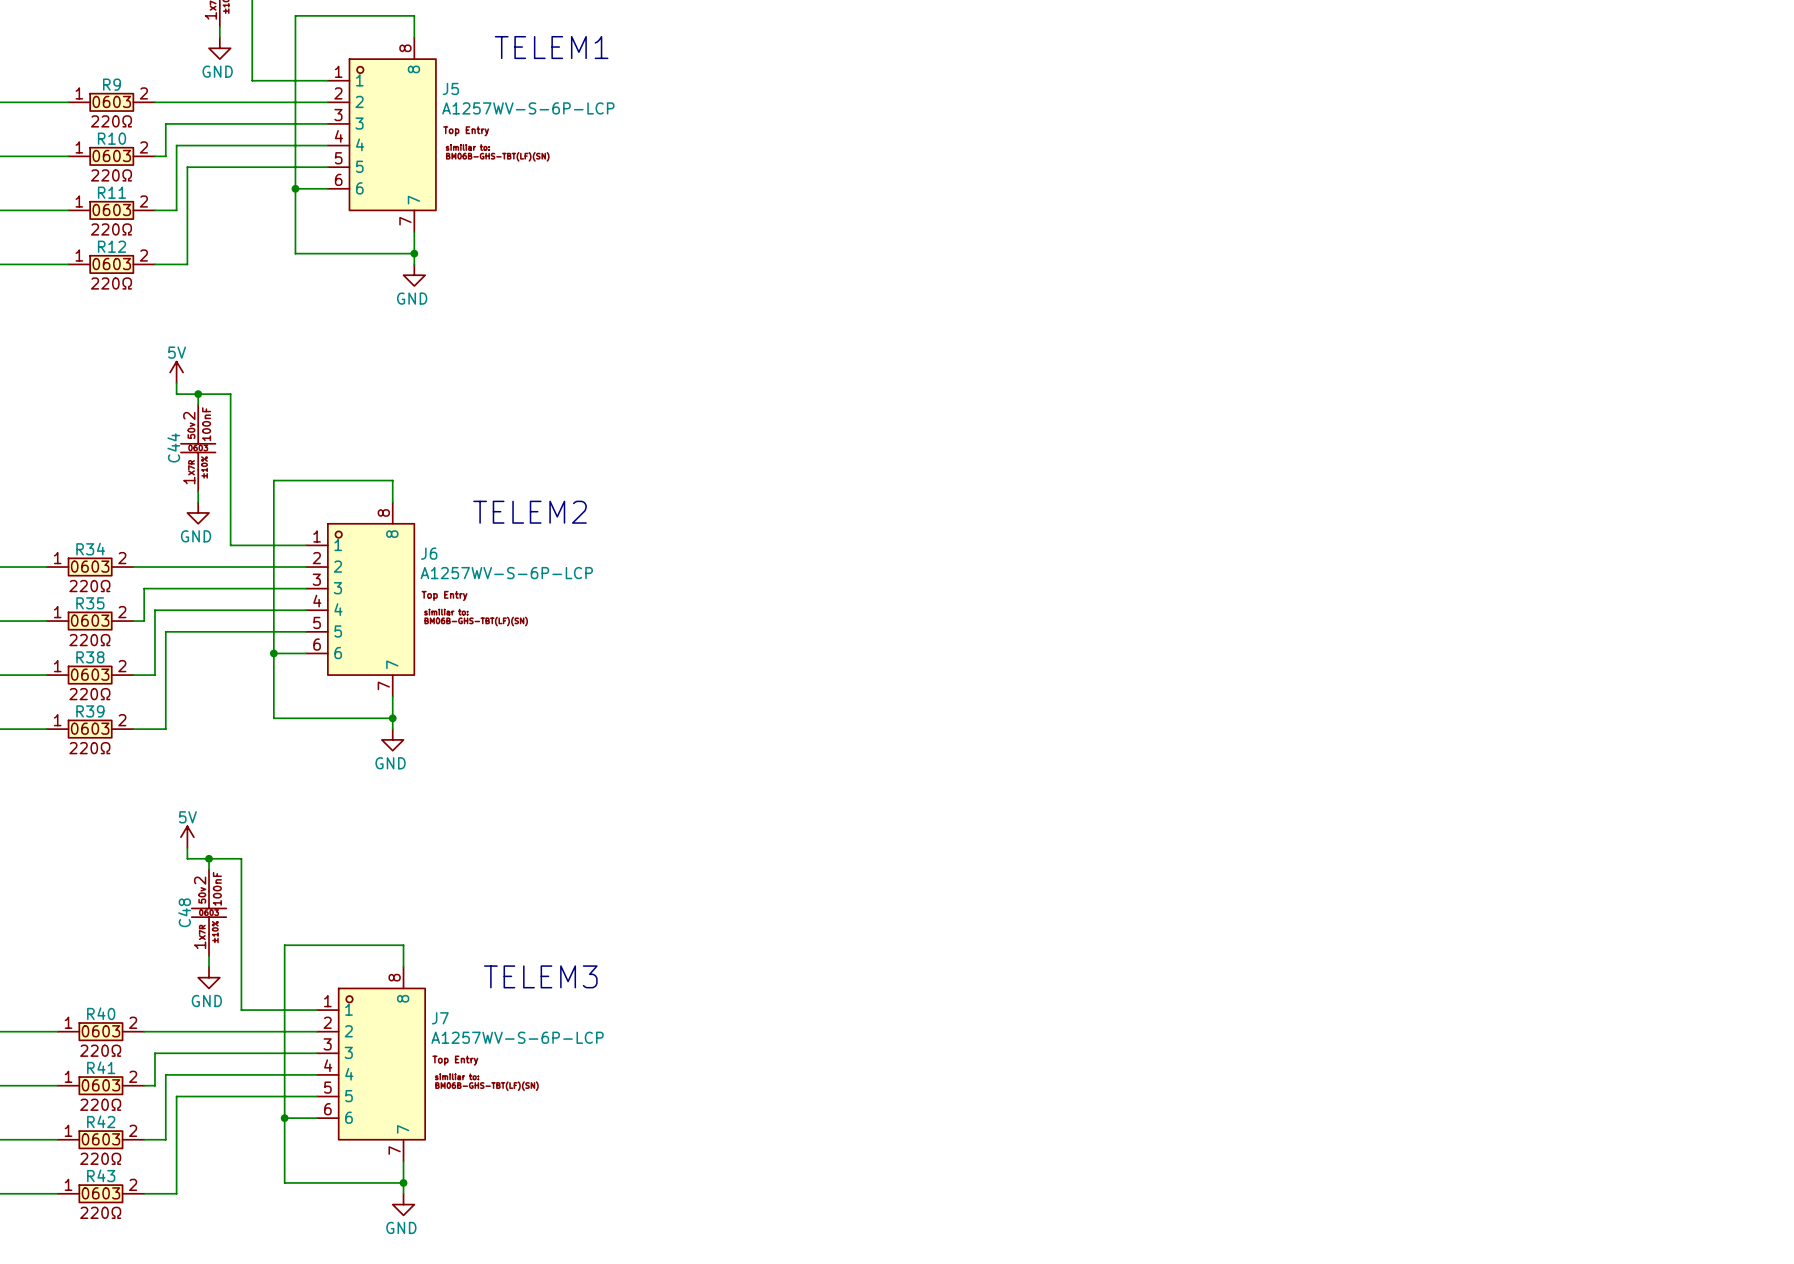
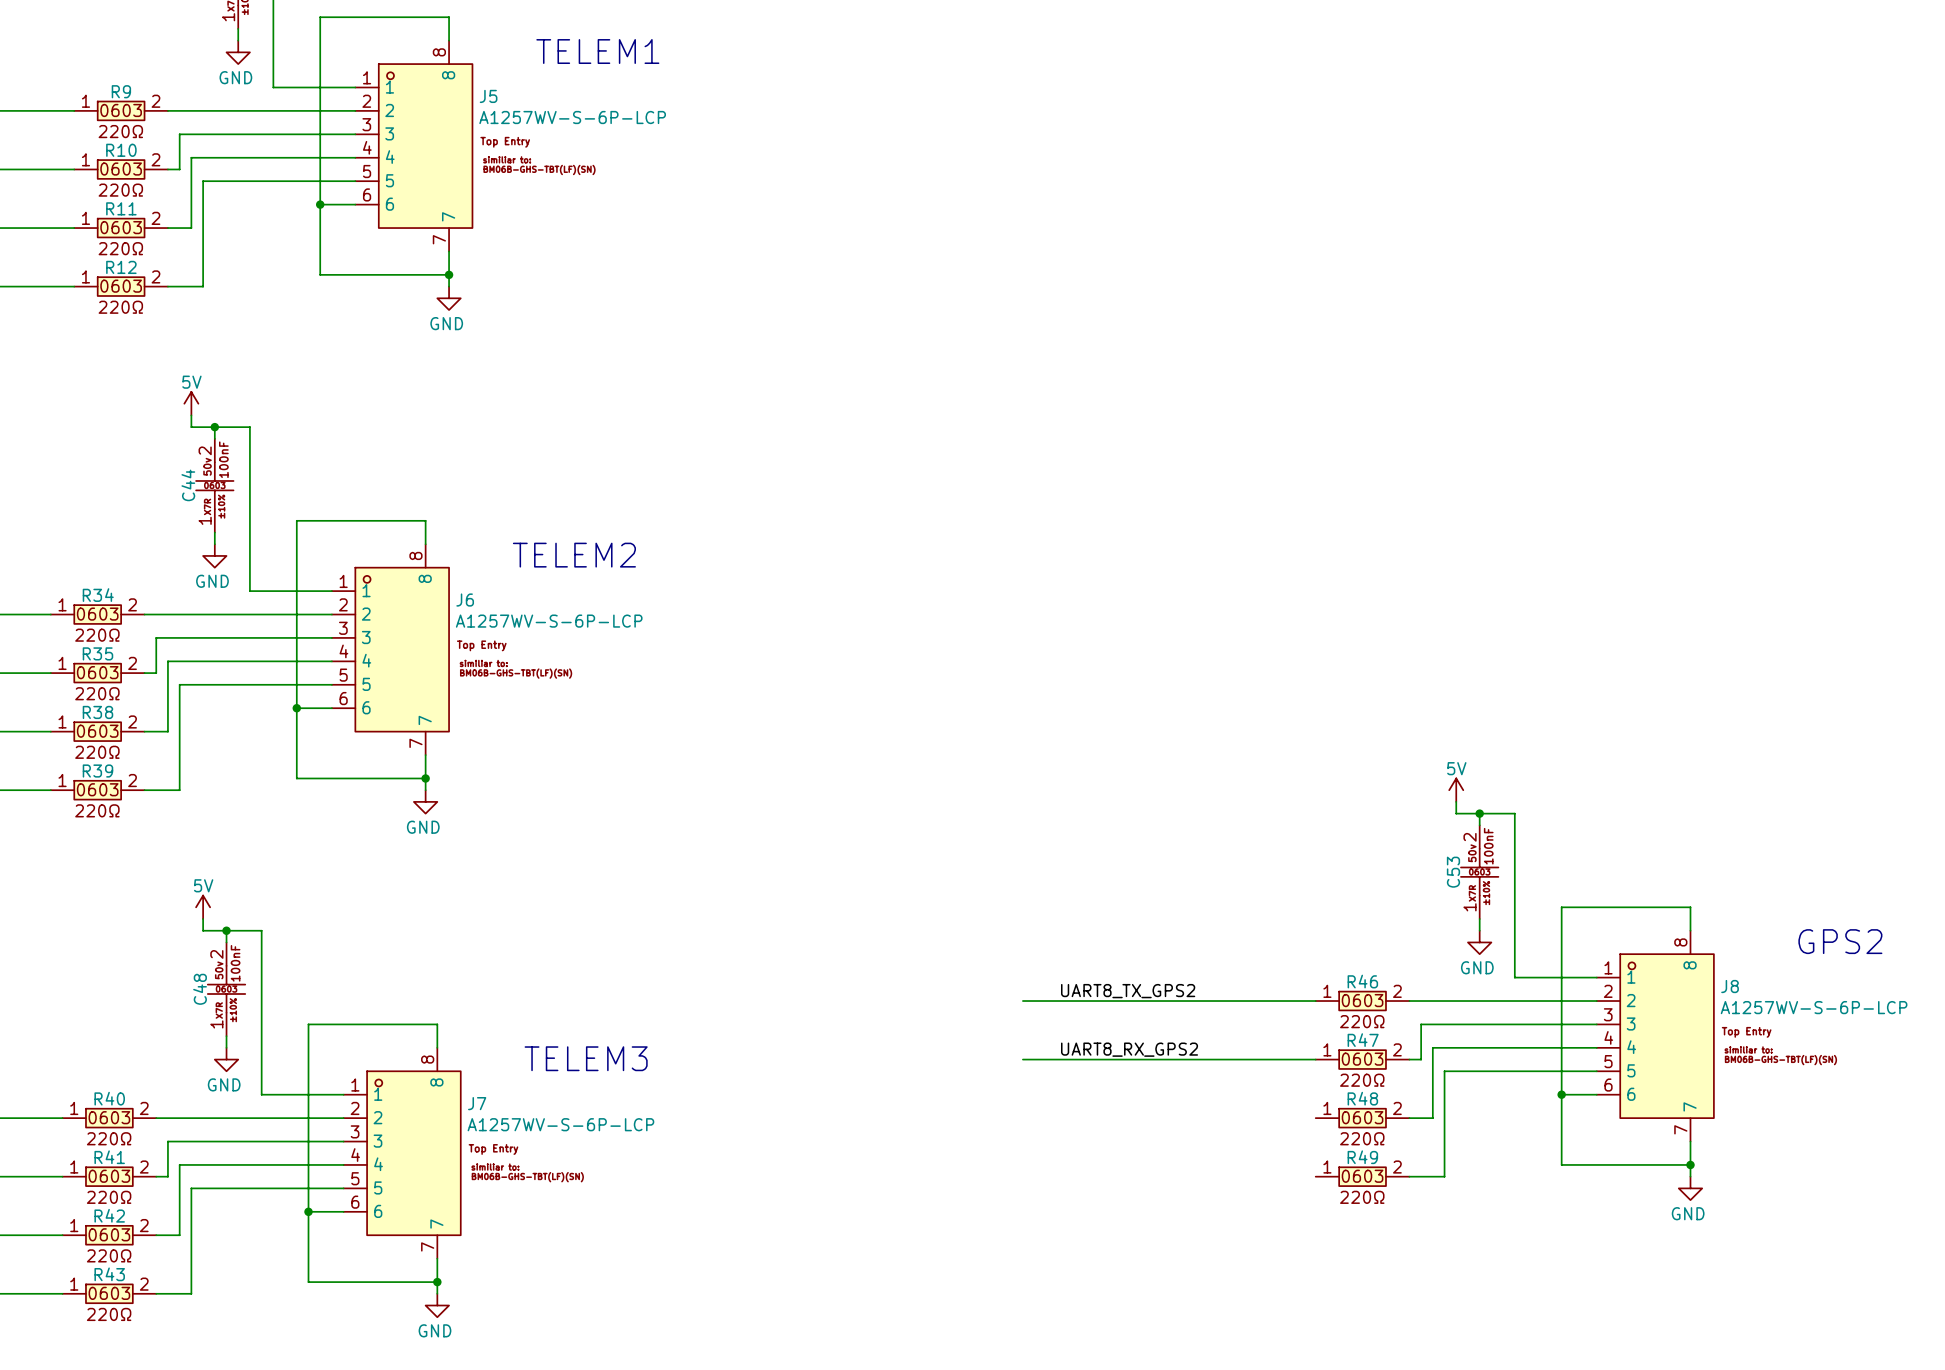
power symbol: none -> 5V (1456, 790)
wire: none -> (1456, 801) (1456, 813) (1514, 813) (1514, 977) (1596, 977)
wire: none -> (1479, 813) (1479, 825)
junction: none -> (1479, 813)
C53: none -> (1479, 872)
wire: none -> (1479, 919) (1479, 930)
wire: none -> (1690, 930) (1690, 907) (1561, 907) (1561, 1164) (1690, 1164)
text: none -> GPS2 (1840, 941)
power symbol: none -> GND (1479, 942)
label: none -> UART8_TX_GPS2 (1128, 991)
wire: none -> (1022, 1001) (1315, 1001)
R46: none -> (1362, 1001)
wire: none -> (1409, 1001) (1596, 1001)
wire: none -> (1596, 1024) (1421, 1024) (1421, 1059) (1409, 1059)
J8: none -> A1257WV-S-6P-LCP (1655, 1036)
wire: none -> (1596, 1047) (1432, 1047) (1432, 1118) (1409, 1118)
label: none -> UART8_RX_GPS2 (1129, 1049)
wire: none -> (1022, 1059) (1315, 1059)
R47: none -> (1362, 1059)
wire: none -> (1596, 1071) (1444, 1071) (1444, 1176) (1409, 1176)
wire: none -> (1561, 1094) (1596, 1094)
junction: none -> (1561, 1094)
R48: none -> (1362, 1118)
wire: none -> (1690, 1141) (1690, 1176)
junction: none -> (1690, 1164)
R49: none -> (1362, 1176)
power symbol: none -> GND (1690, 1188)

